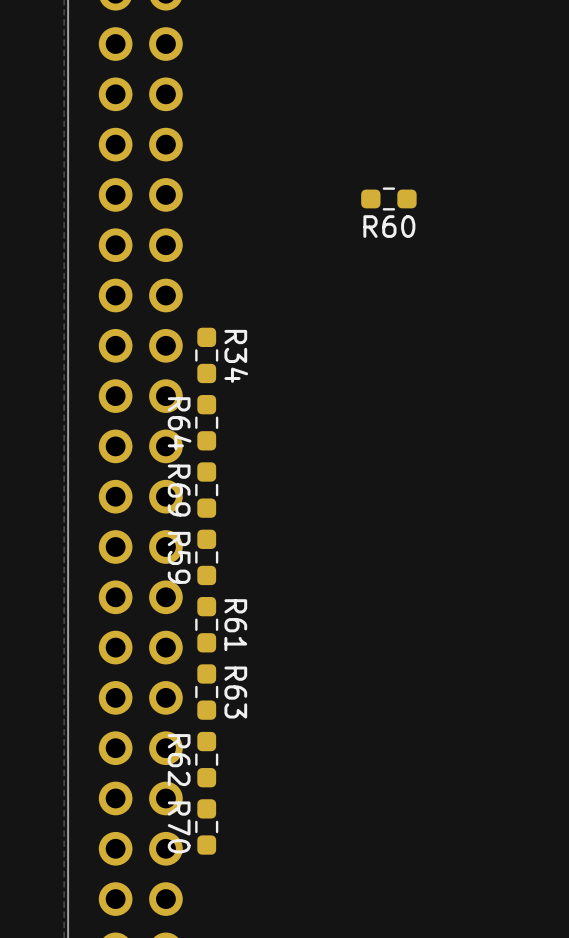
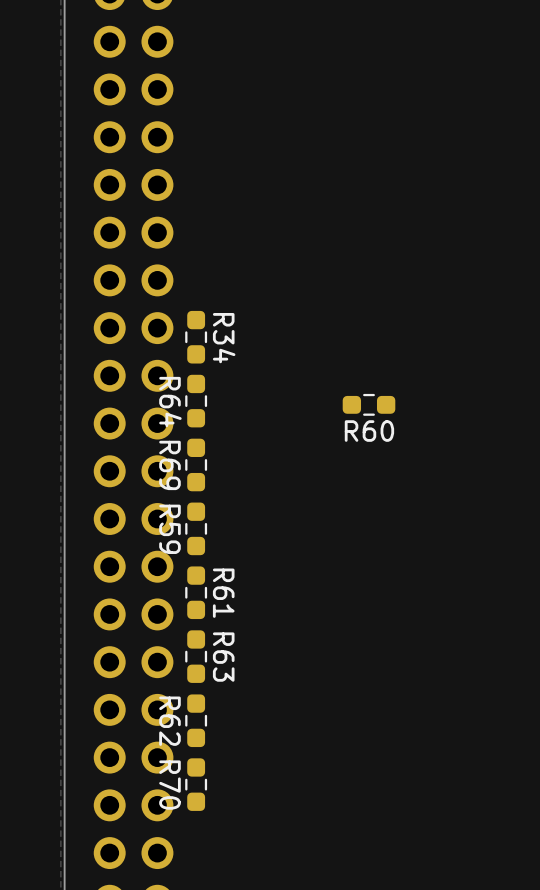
R60 position: (388, 198) -> (369, 404)

